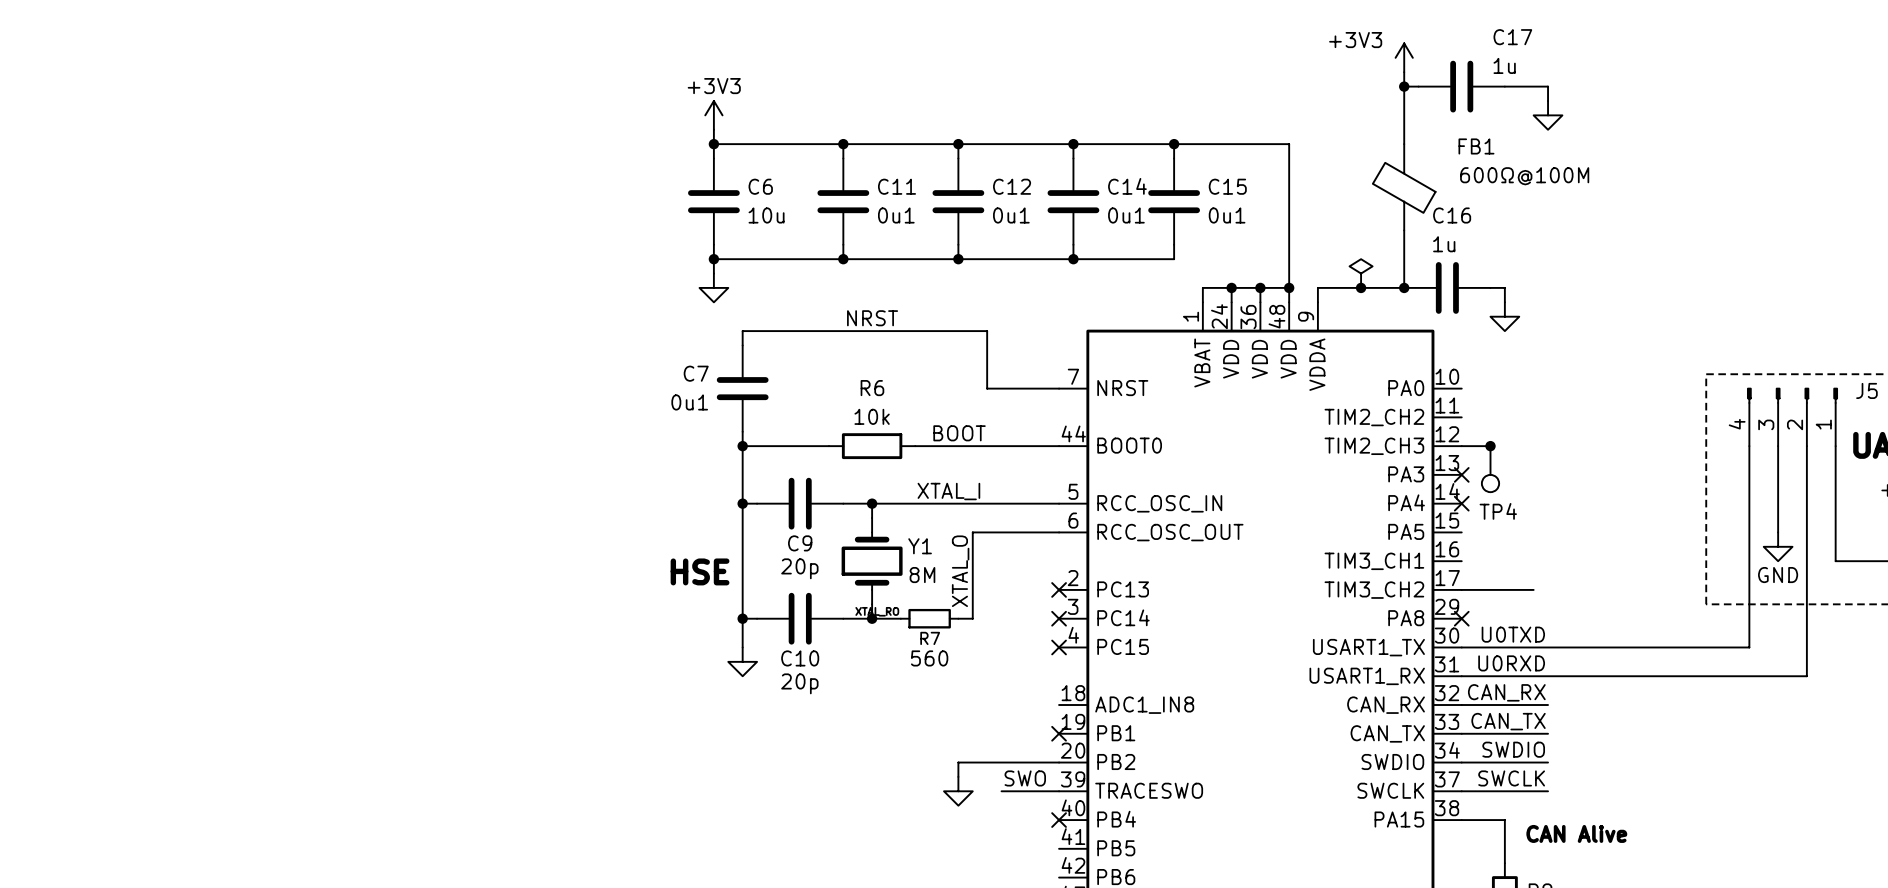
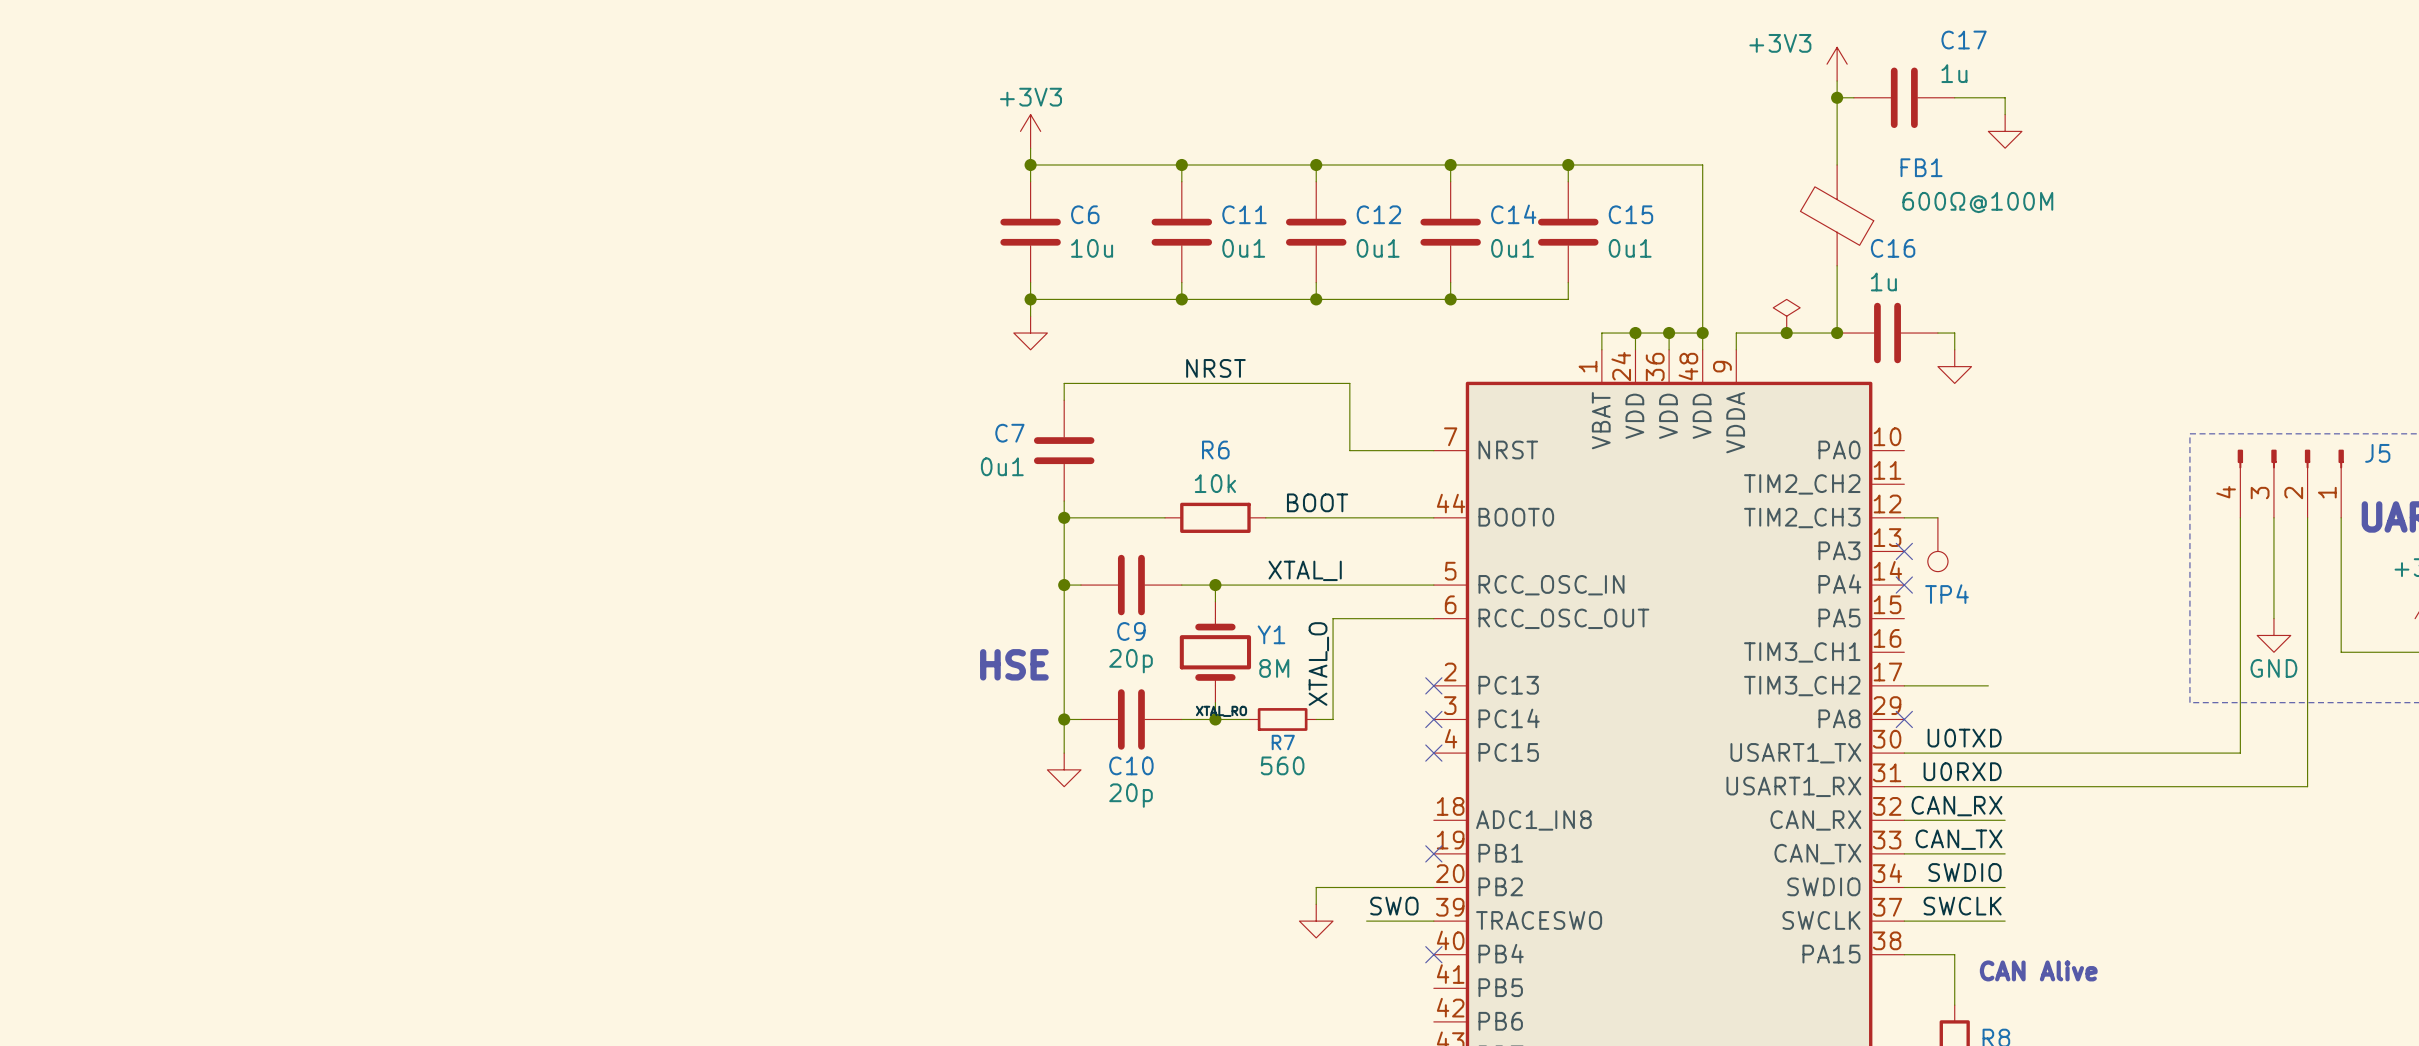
junction: (1490, 446) -> none

